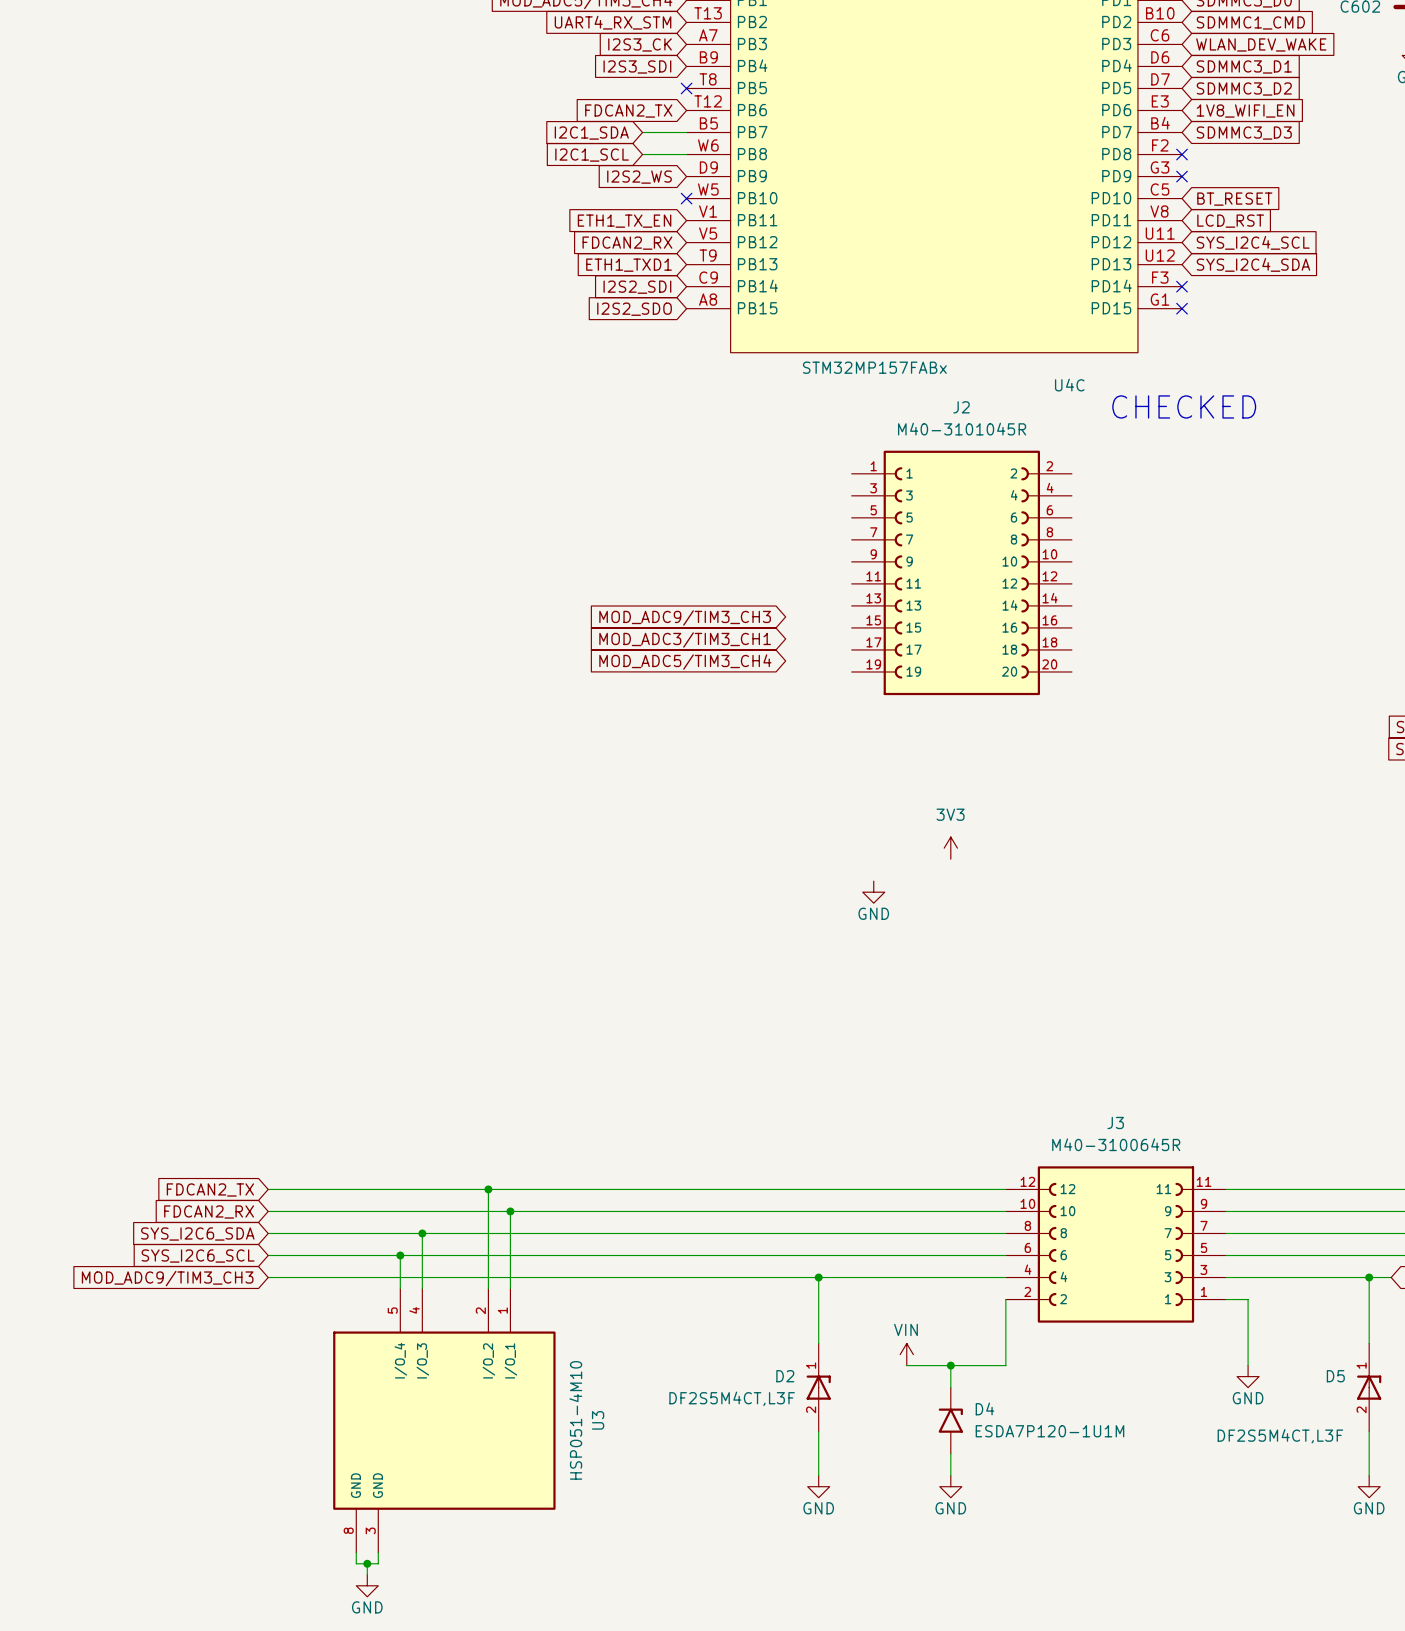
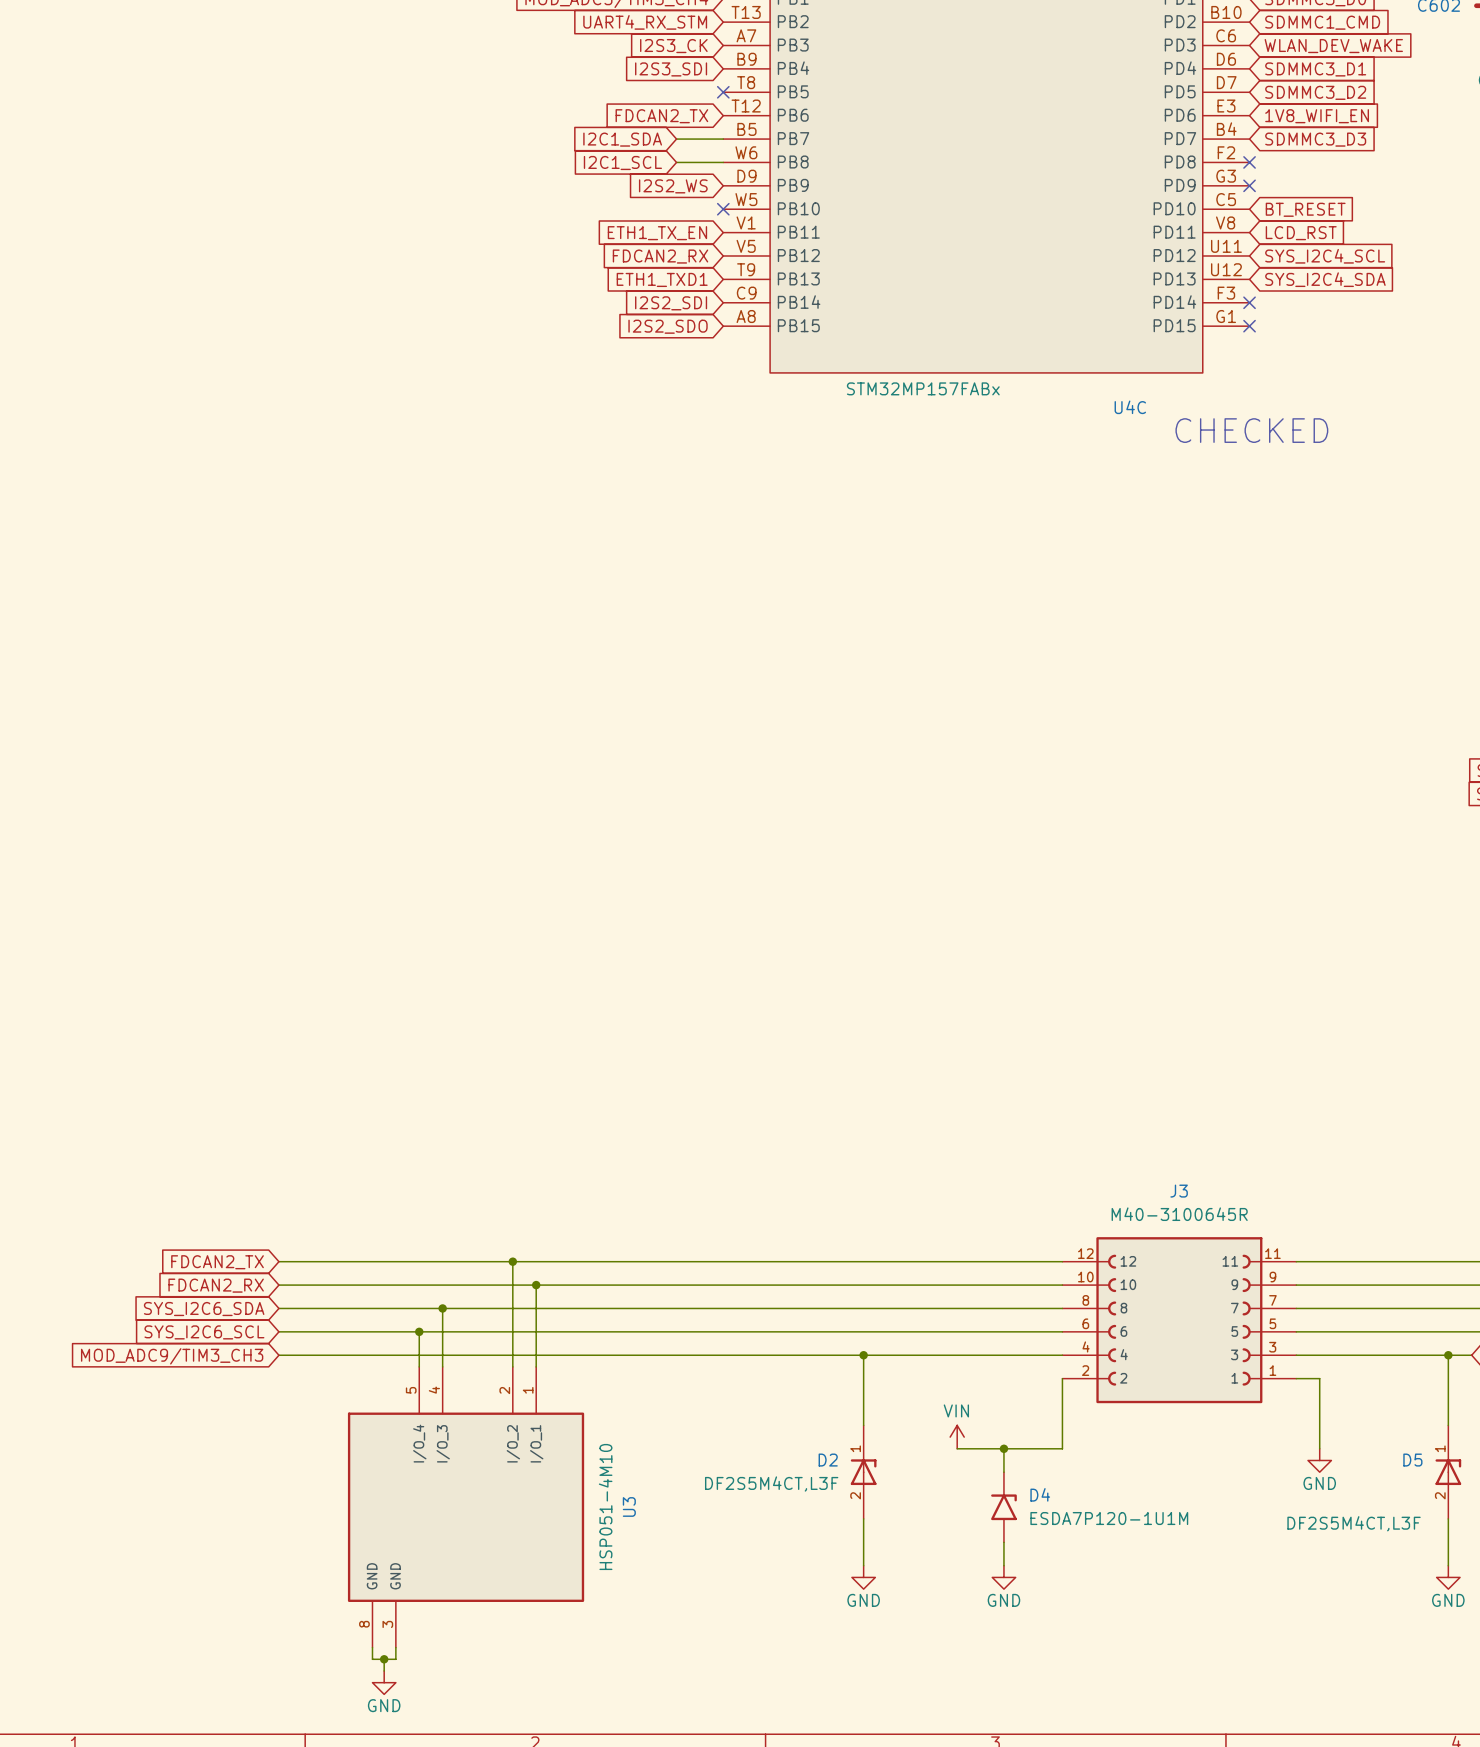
J2: M40-3101045R (961, 572) -> none
global label: MOD_ADC9/TIM3_CH3 (685, 617) -> none
global label: MOD_ADC3/TIM3_CH1 (685, 640) -> none
global label: MOD_ADC5/TIM3_CH4 (685, 662) -> none
power symbol: 3V3 (950, 848) -> none
power symbol: GND (873, 892) -> none

